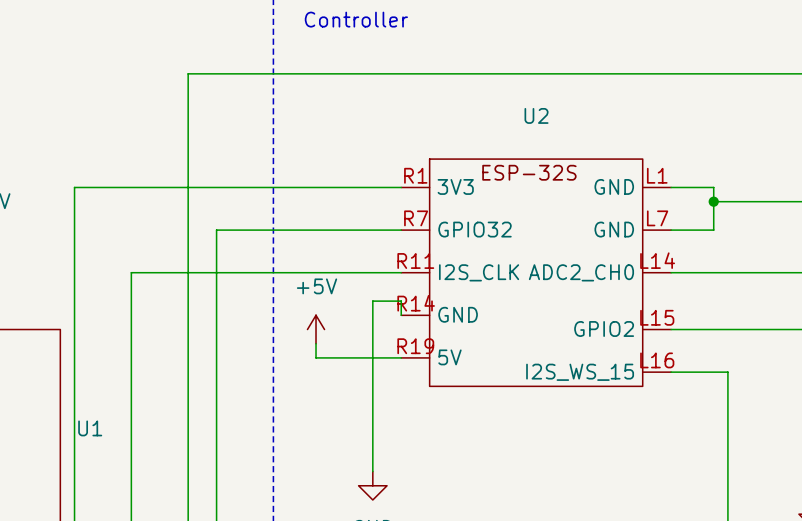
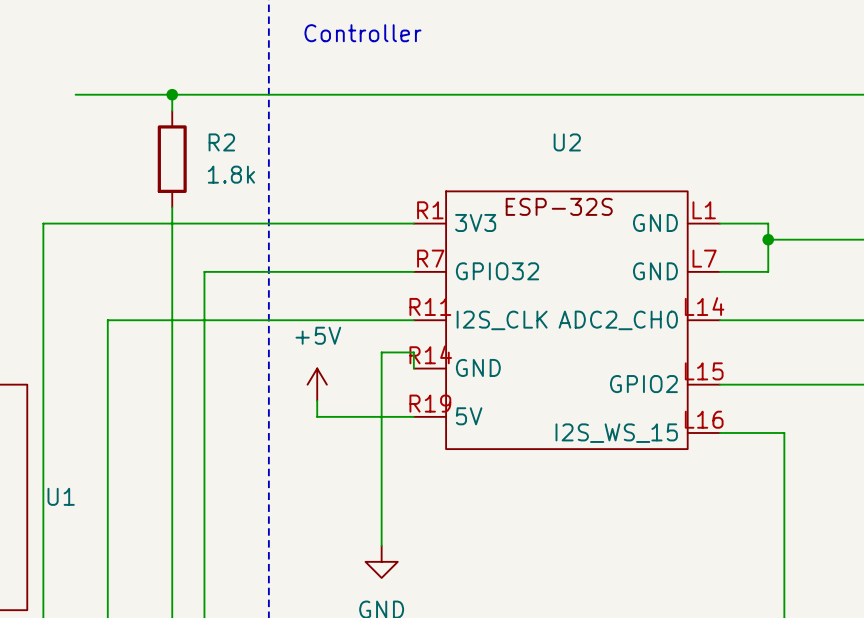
wire: none -> (75, 94) (172, 94)
junction: none -> (172, 94)
wire: (188, 88) (188, 173) -> none
R2: none -> 1.8k (172, 159)

